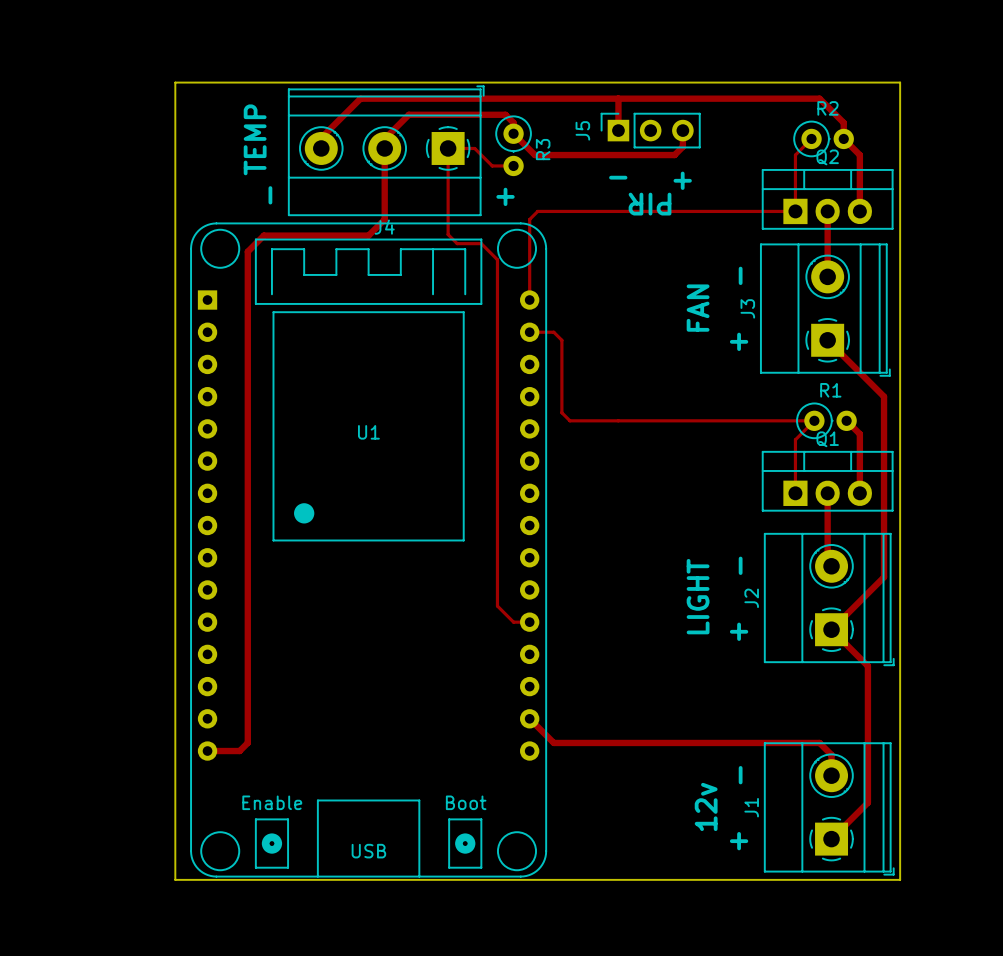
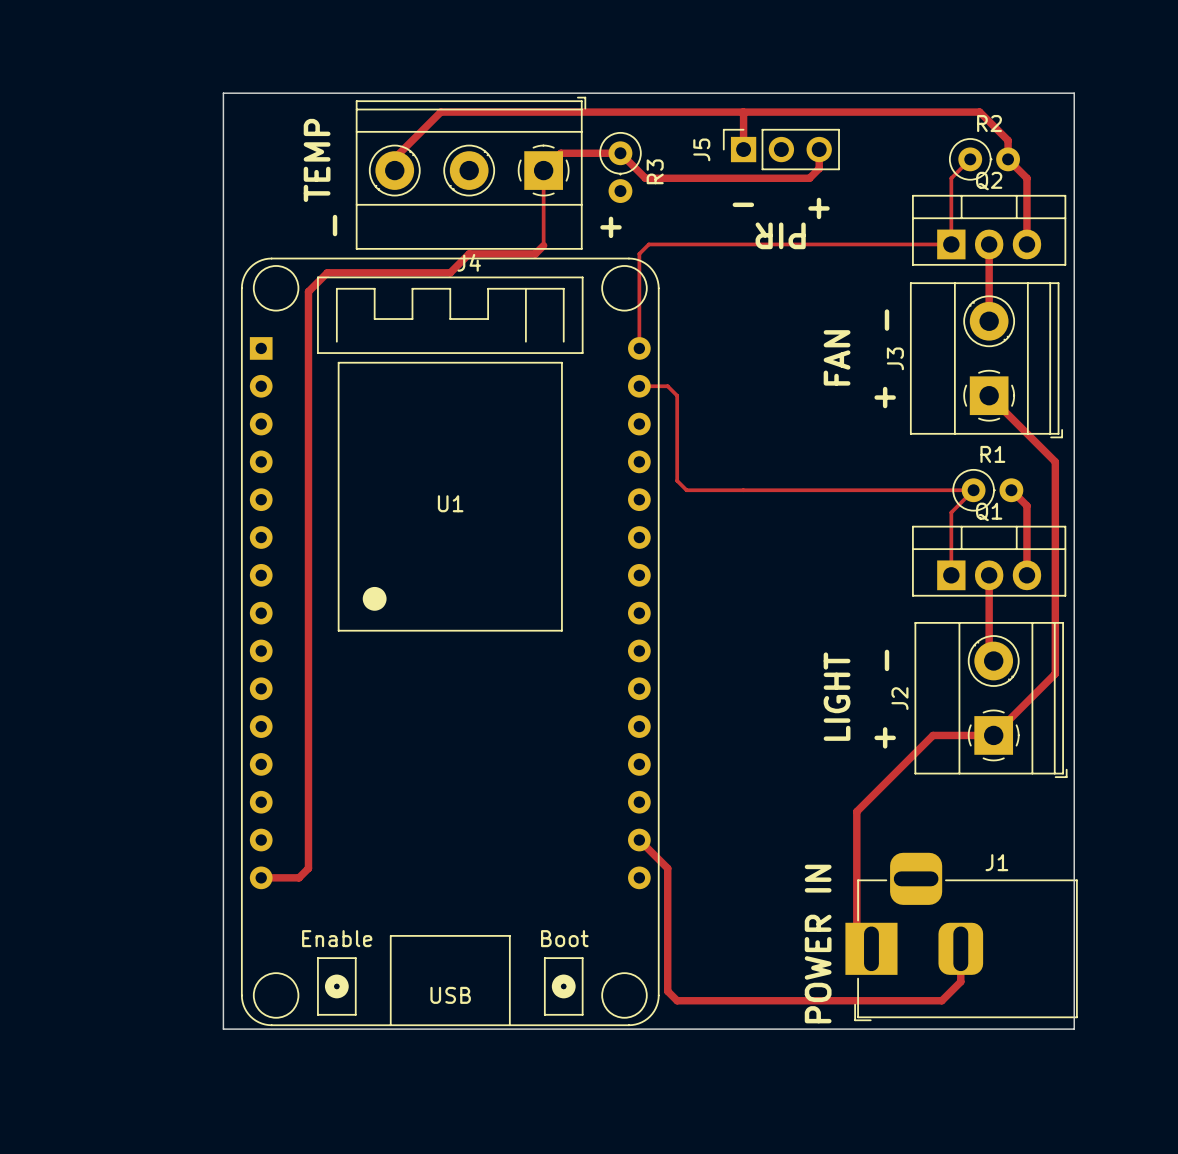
track: (513, 133) (513, 122) (505, 114) (408, 114) (384, 138) (384, 219) -> (543, 245) (535, 253) (469, 253)
track: none -> (620, 153) (560, 153) (550, 163)
track: (448, 148) (474, 148) (492, 165) (513, 165) -> none
track: (448, 212) (448, 234) (457, 243) (481, 243) (497, 259) (497, 606) (513, 622) (529, 622) -> none
track: (831, 629) (867, 666) (867, 802) (831, 839) -> (993, 735) (933, 735) (856, 811) (856, 934) (871, 948)
track: (553, 742) (819, 742) (831, 754) (831, 775) -> (667, 868) (667, 991) (677, 1000) (941, 1000) (960, 981) (960, 948)
J1 footprint: [764, 742, 895, 876] -> [845, 852, 1078, 1022]
text: - (740, 775) -> none
text: 12v (706, 806) -> none
text: none -> POWER IN (818, 944)
J1 name position: J1 (751, 807) -> J1 (996, 862)
text: + (739, 841) -> none

